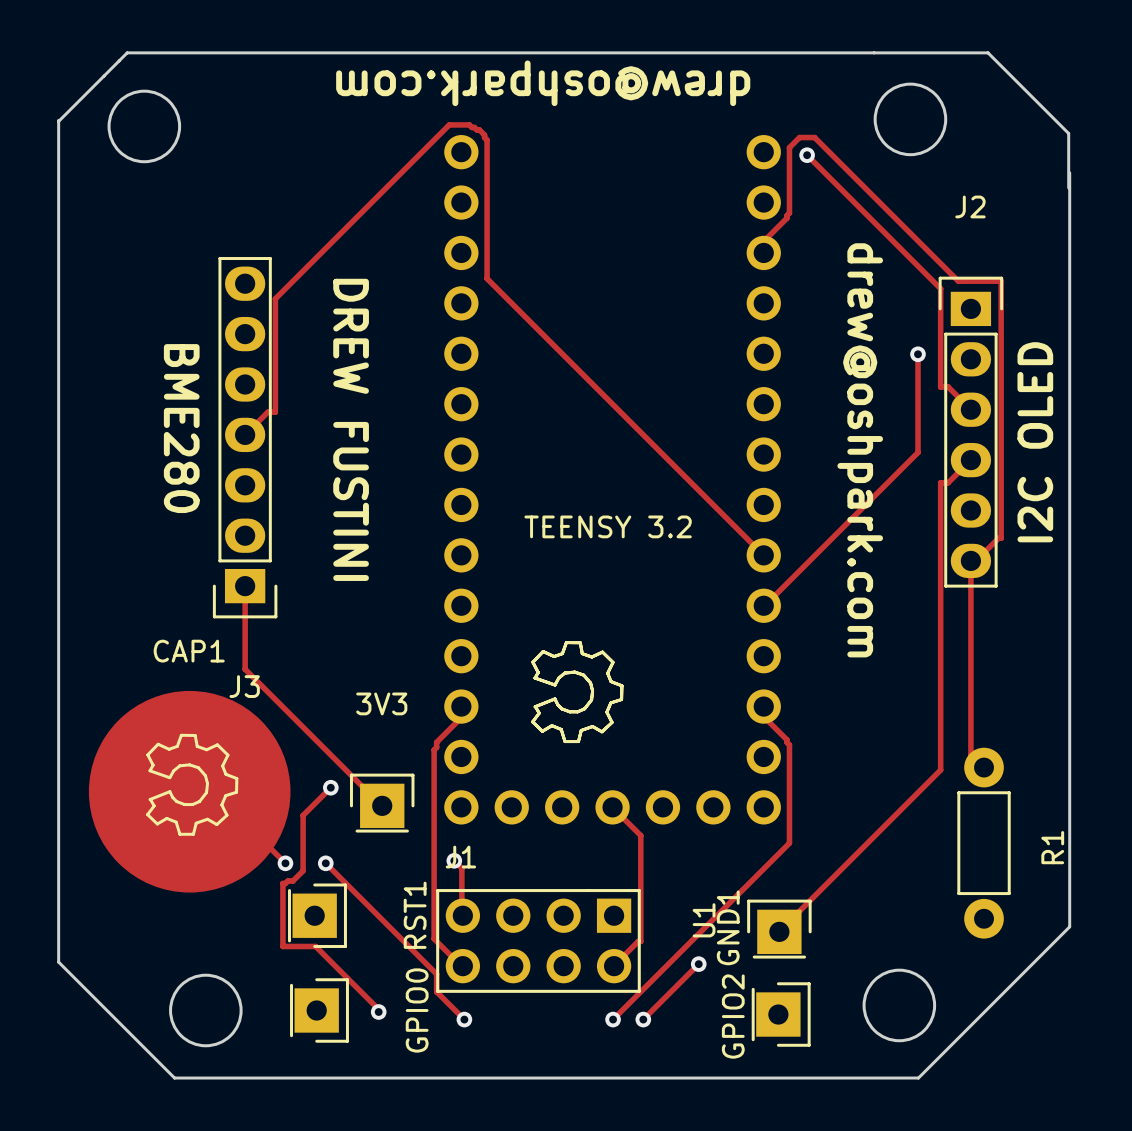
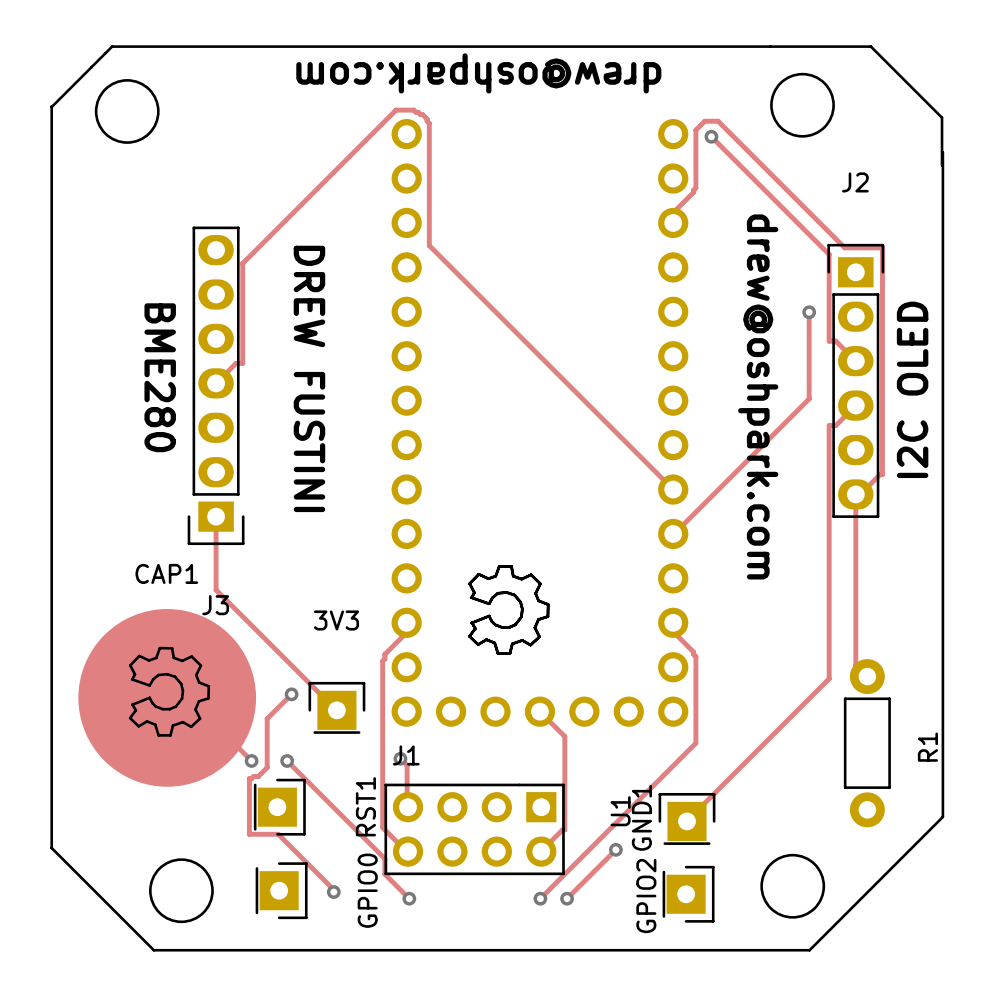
J1 text: TEENSY 3.2 (608, 526) -> none

